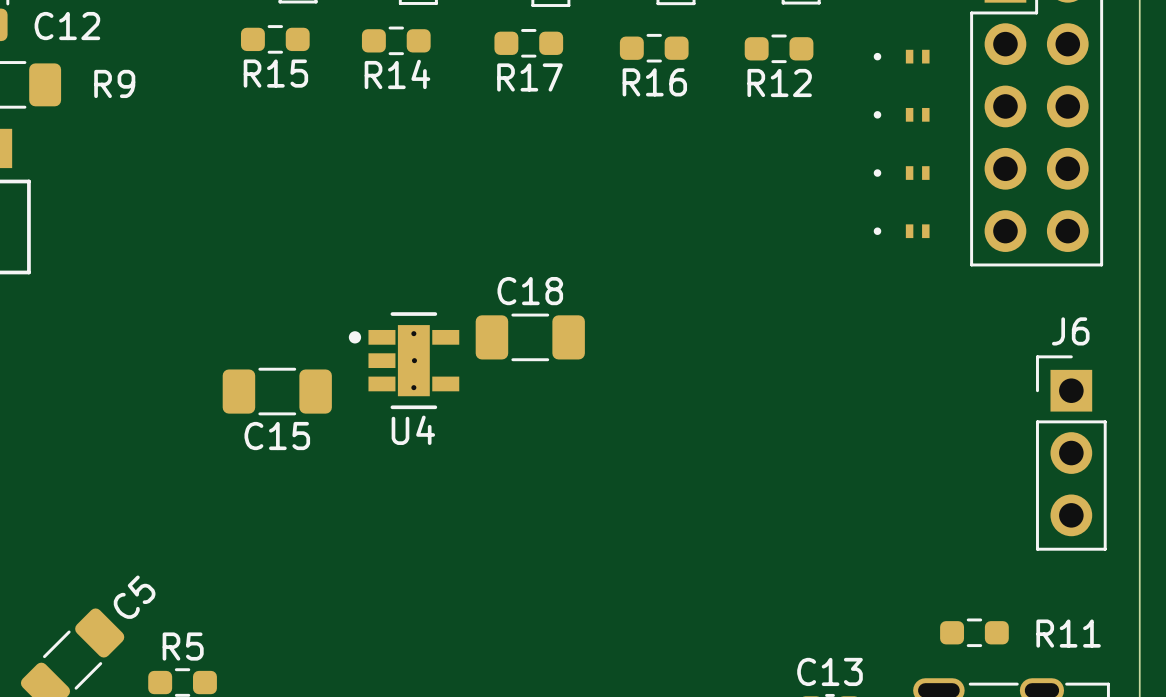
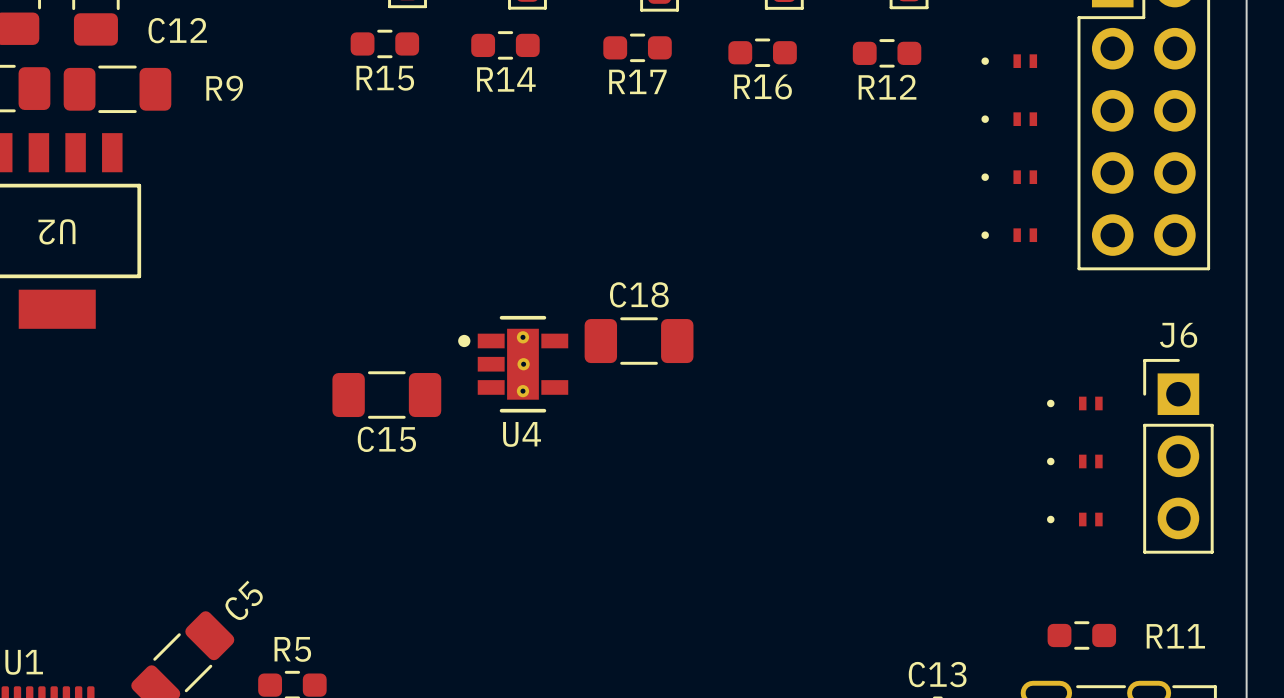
part: none -> (1074, 403)
part: none -> (1074, 461)
part: none -> (1074, 519)

